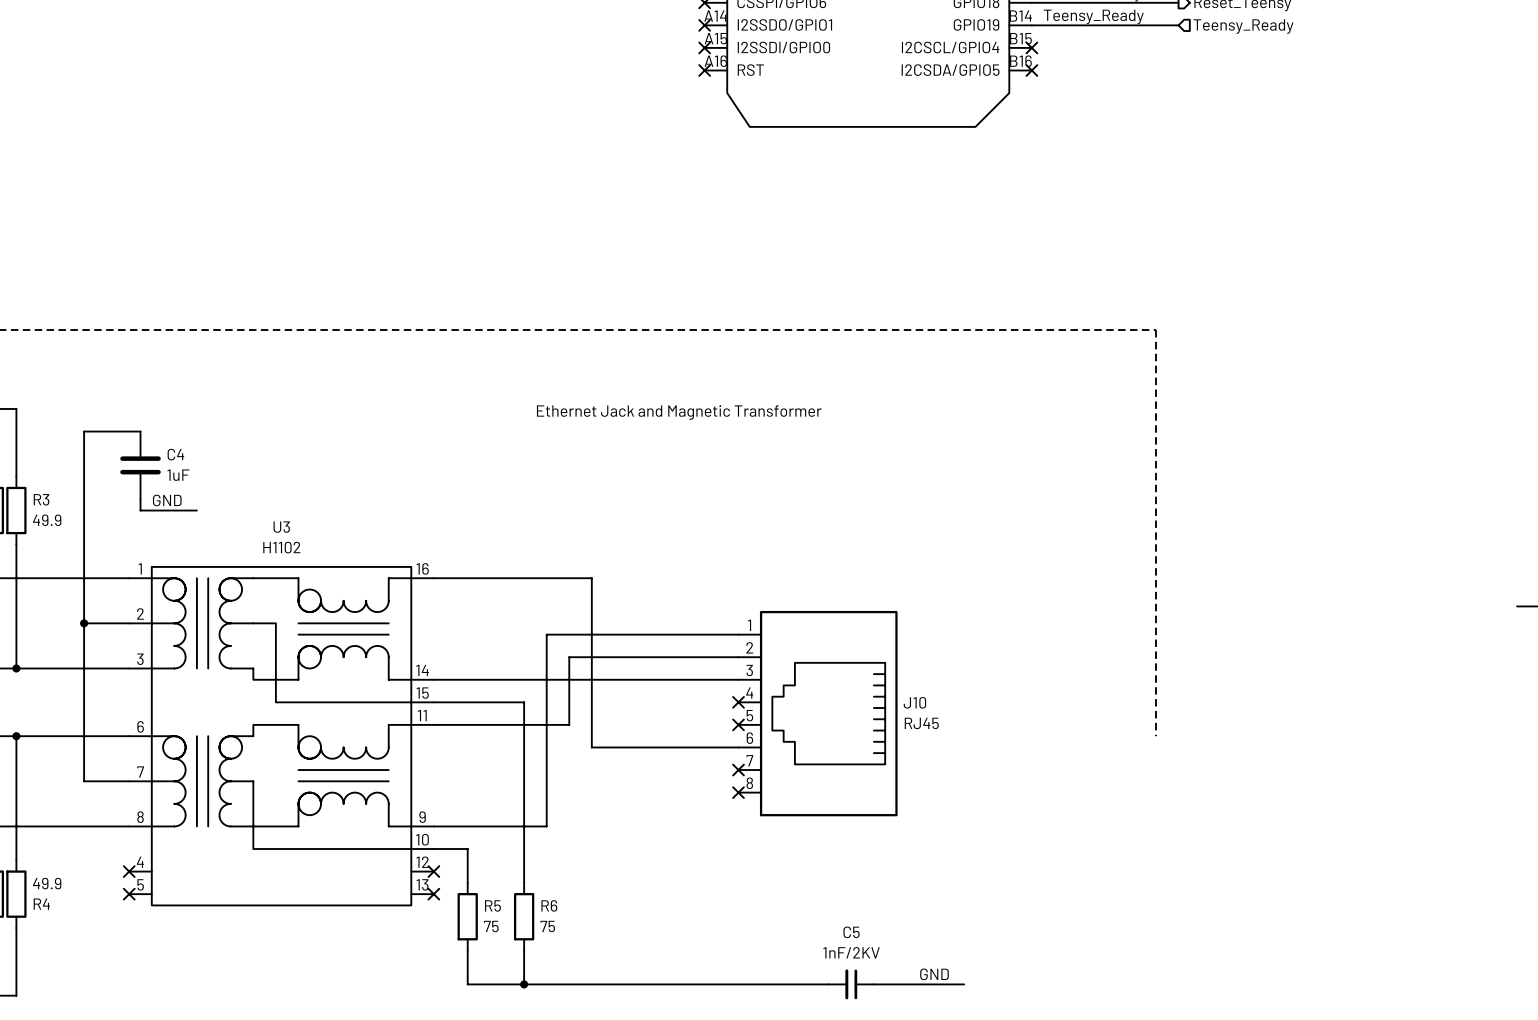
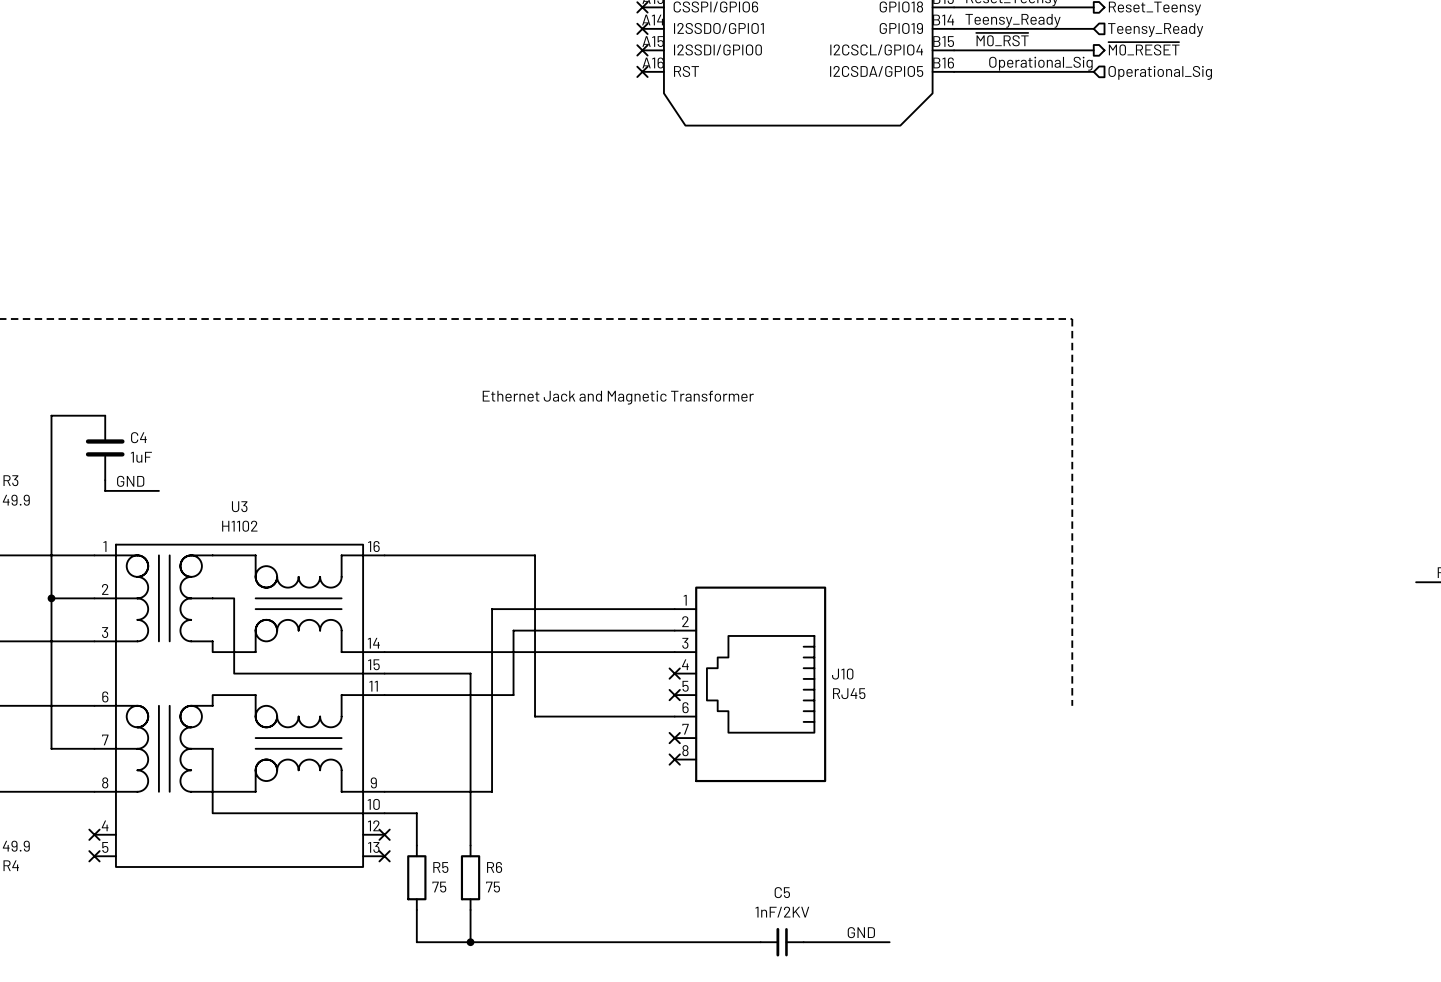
label: none -> ~{M0_RST} (1002, 39)
hierarchical label: none -> ~{M0_RESET} (1143, 48)
wire: none -> (954, 50) (1093, 50)
no-connect mark: (1031, 47) -> none
label: none -> Operational_Sig (1040, 63)
wire: none -> (954, 71) (1093, 71)
no-connect mark: (1031, 70) -> none
hierarchical label: none -> Operational_Sig (1160, 72)

